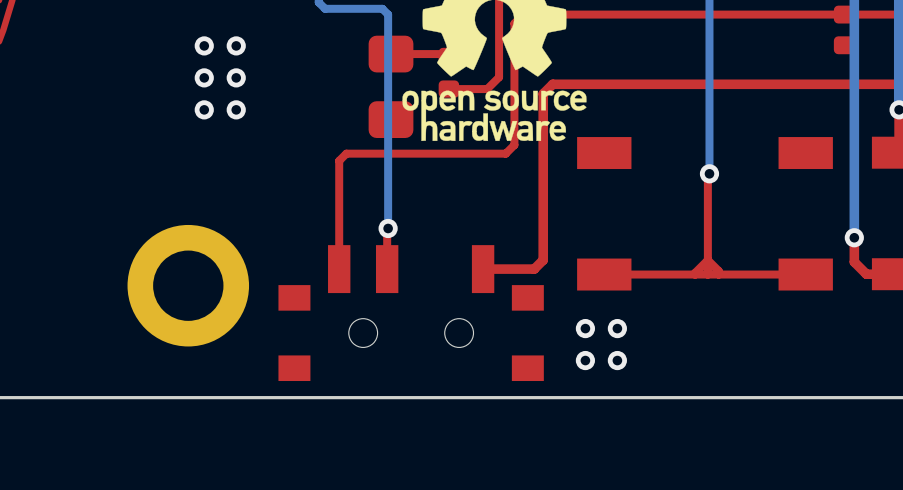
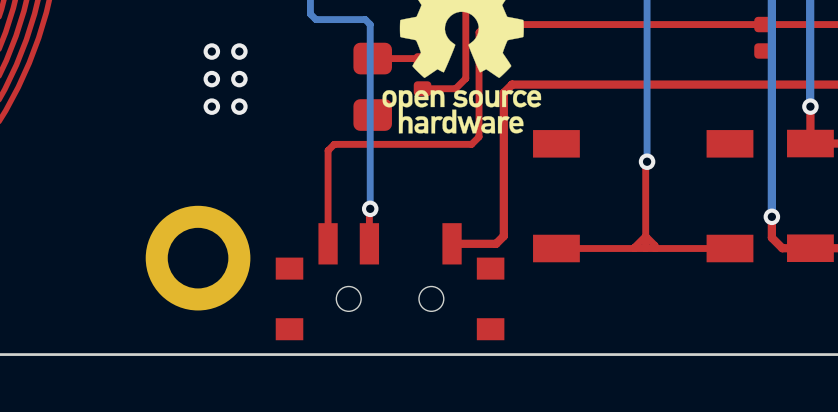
via: (585, 328) -> none
via: (617, 328) -> none
via: (585, 360) -> none
via: (617, 360) -> none

